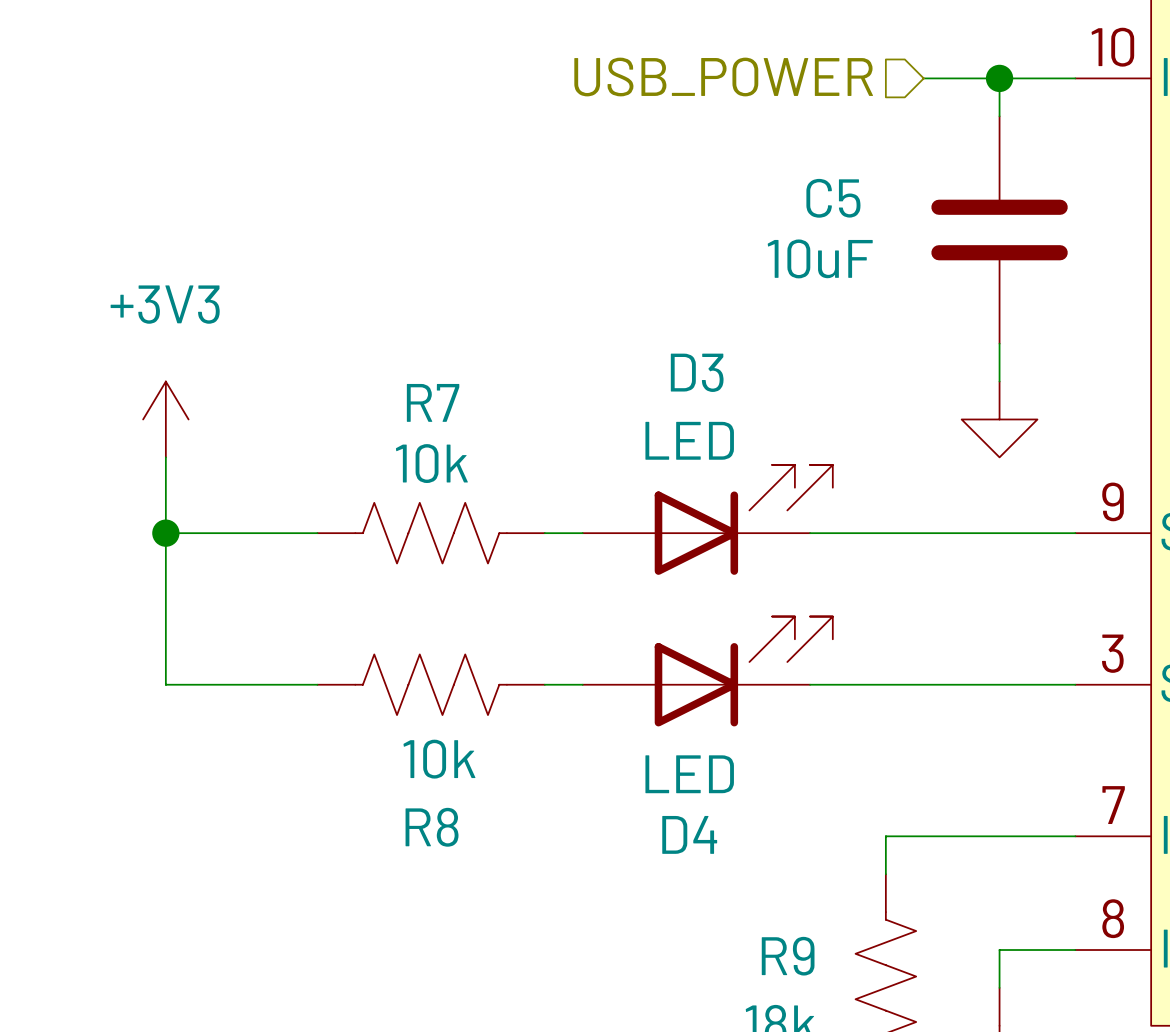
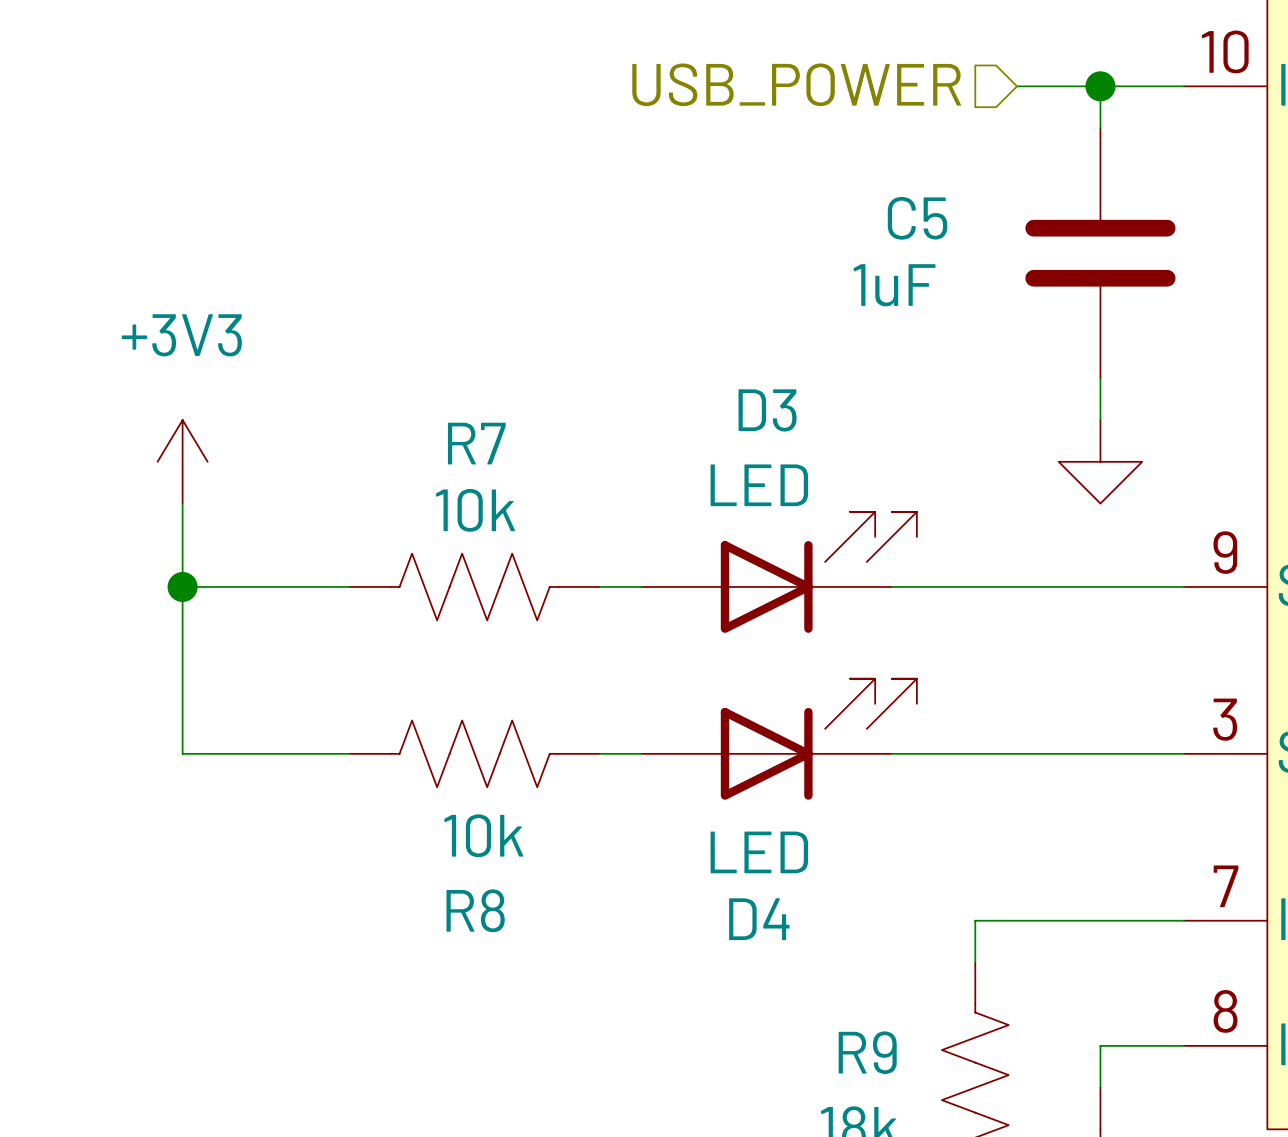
C5 value: 10uF (820, 258) -> 1uF (894, 285)

